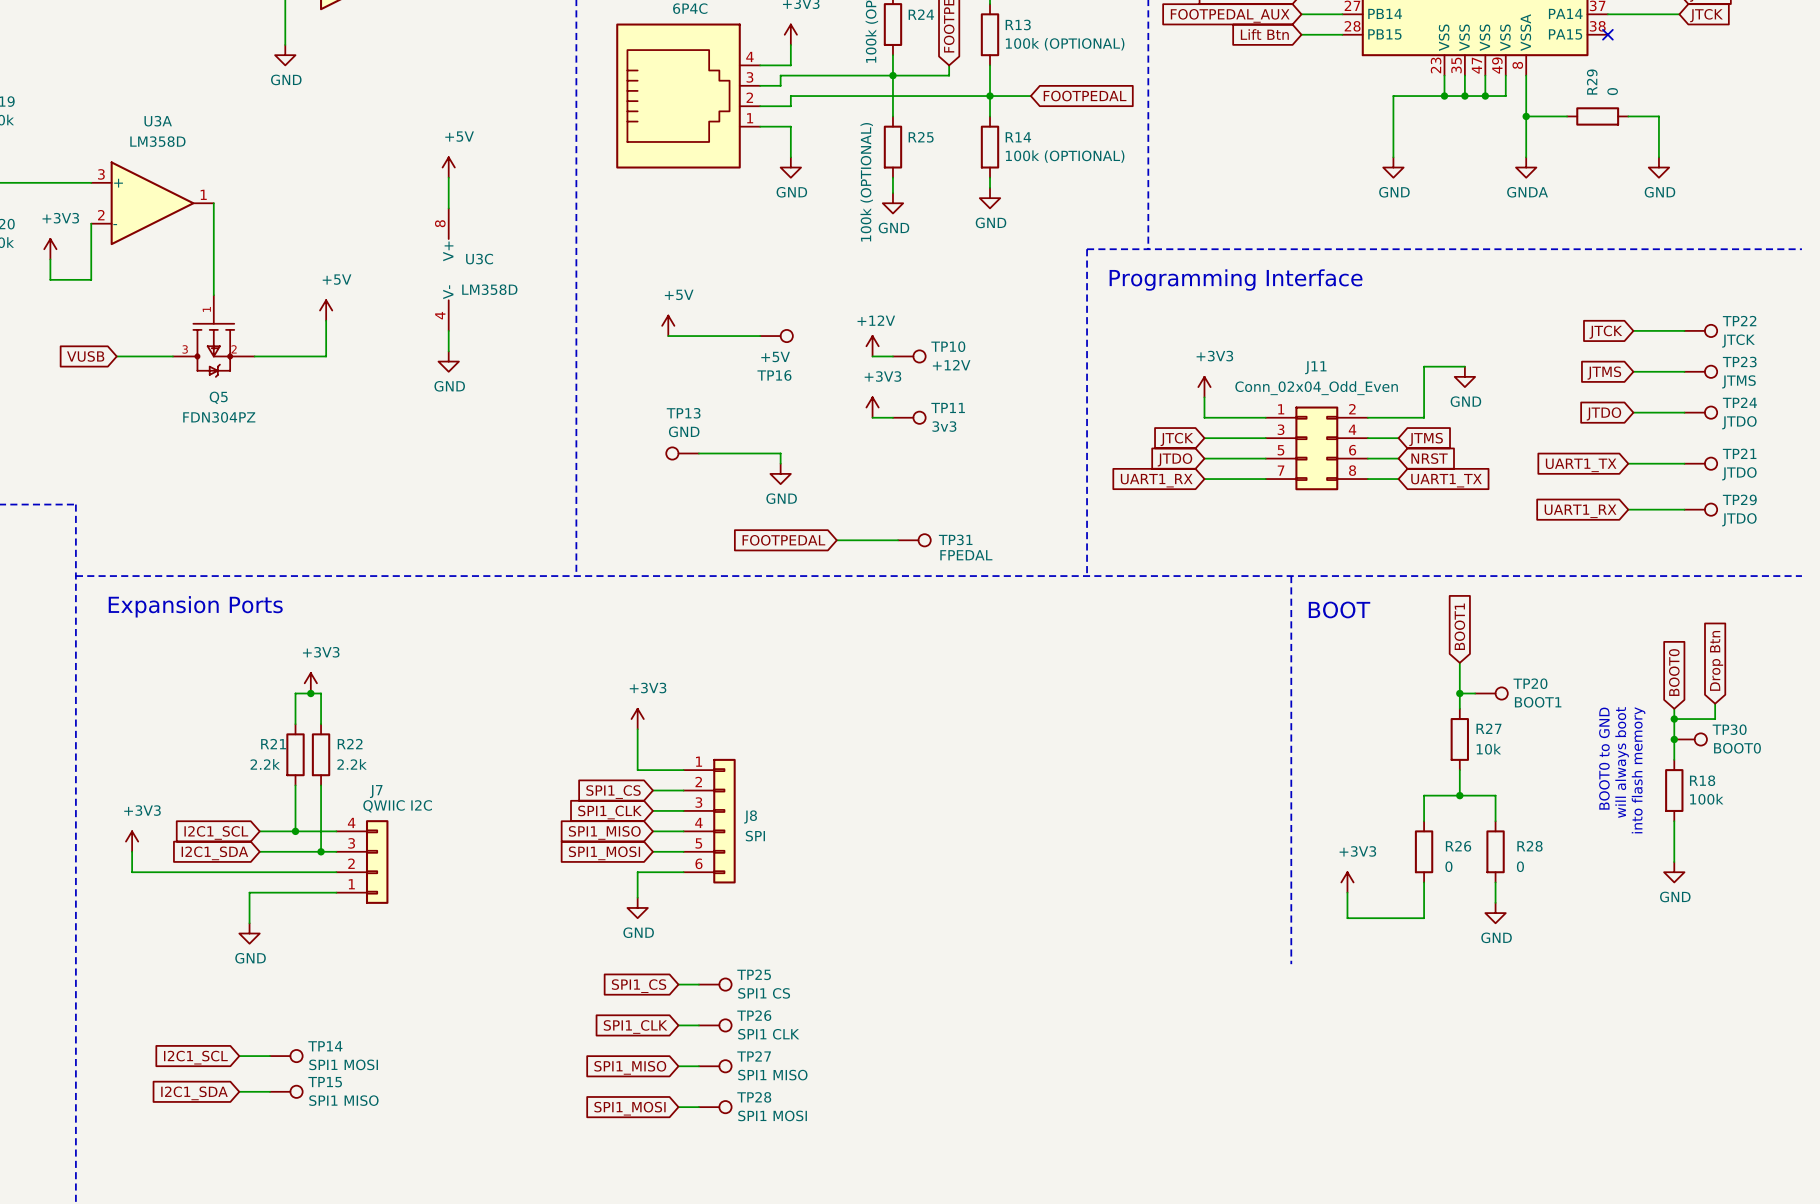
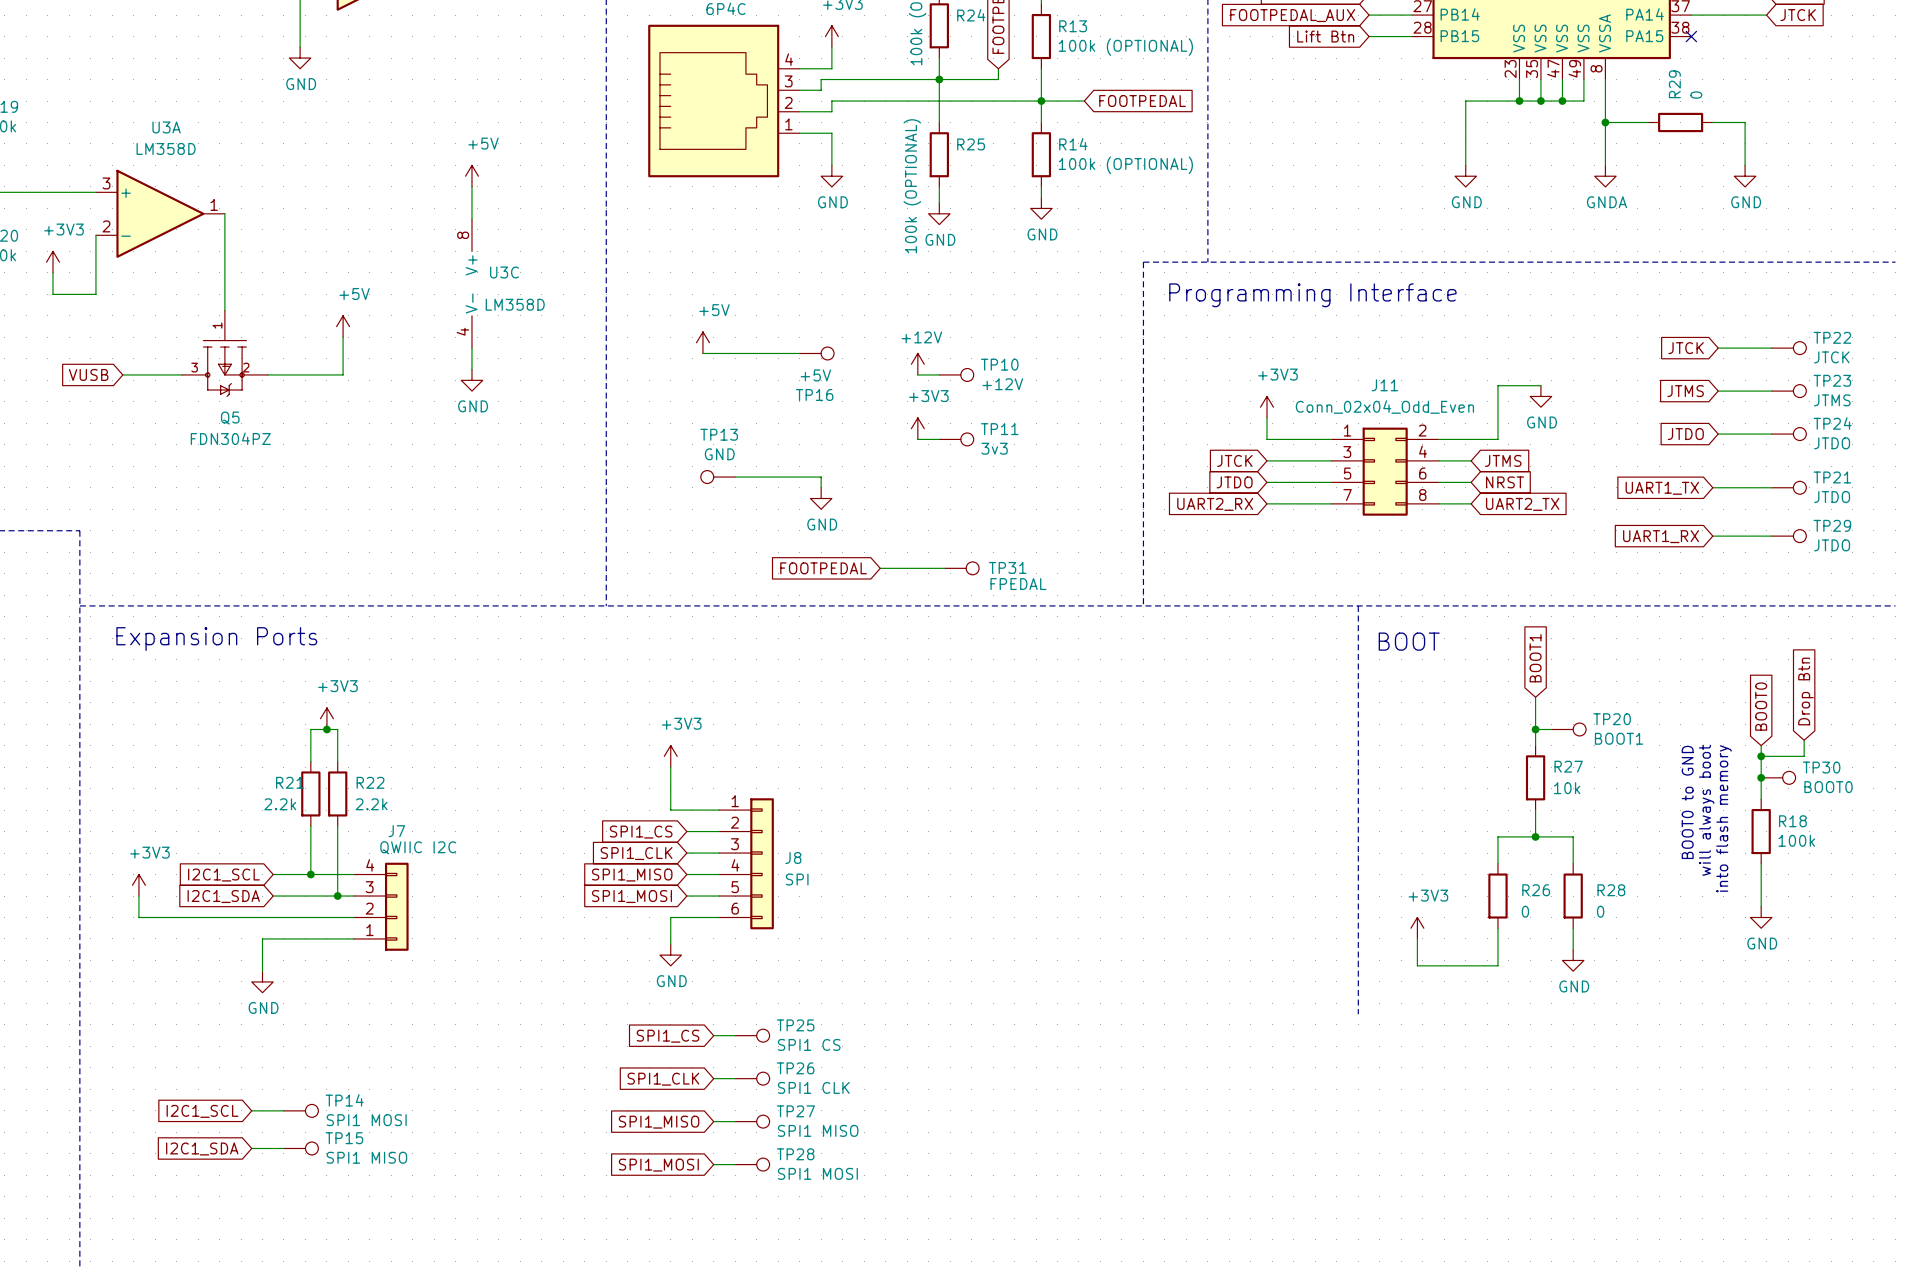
global label: UART1_RX (1156, 480) -> UART2_RX (1215, 504)
global label: UART1_TX (1446, 480) -> UART2_TX (1522, 504)

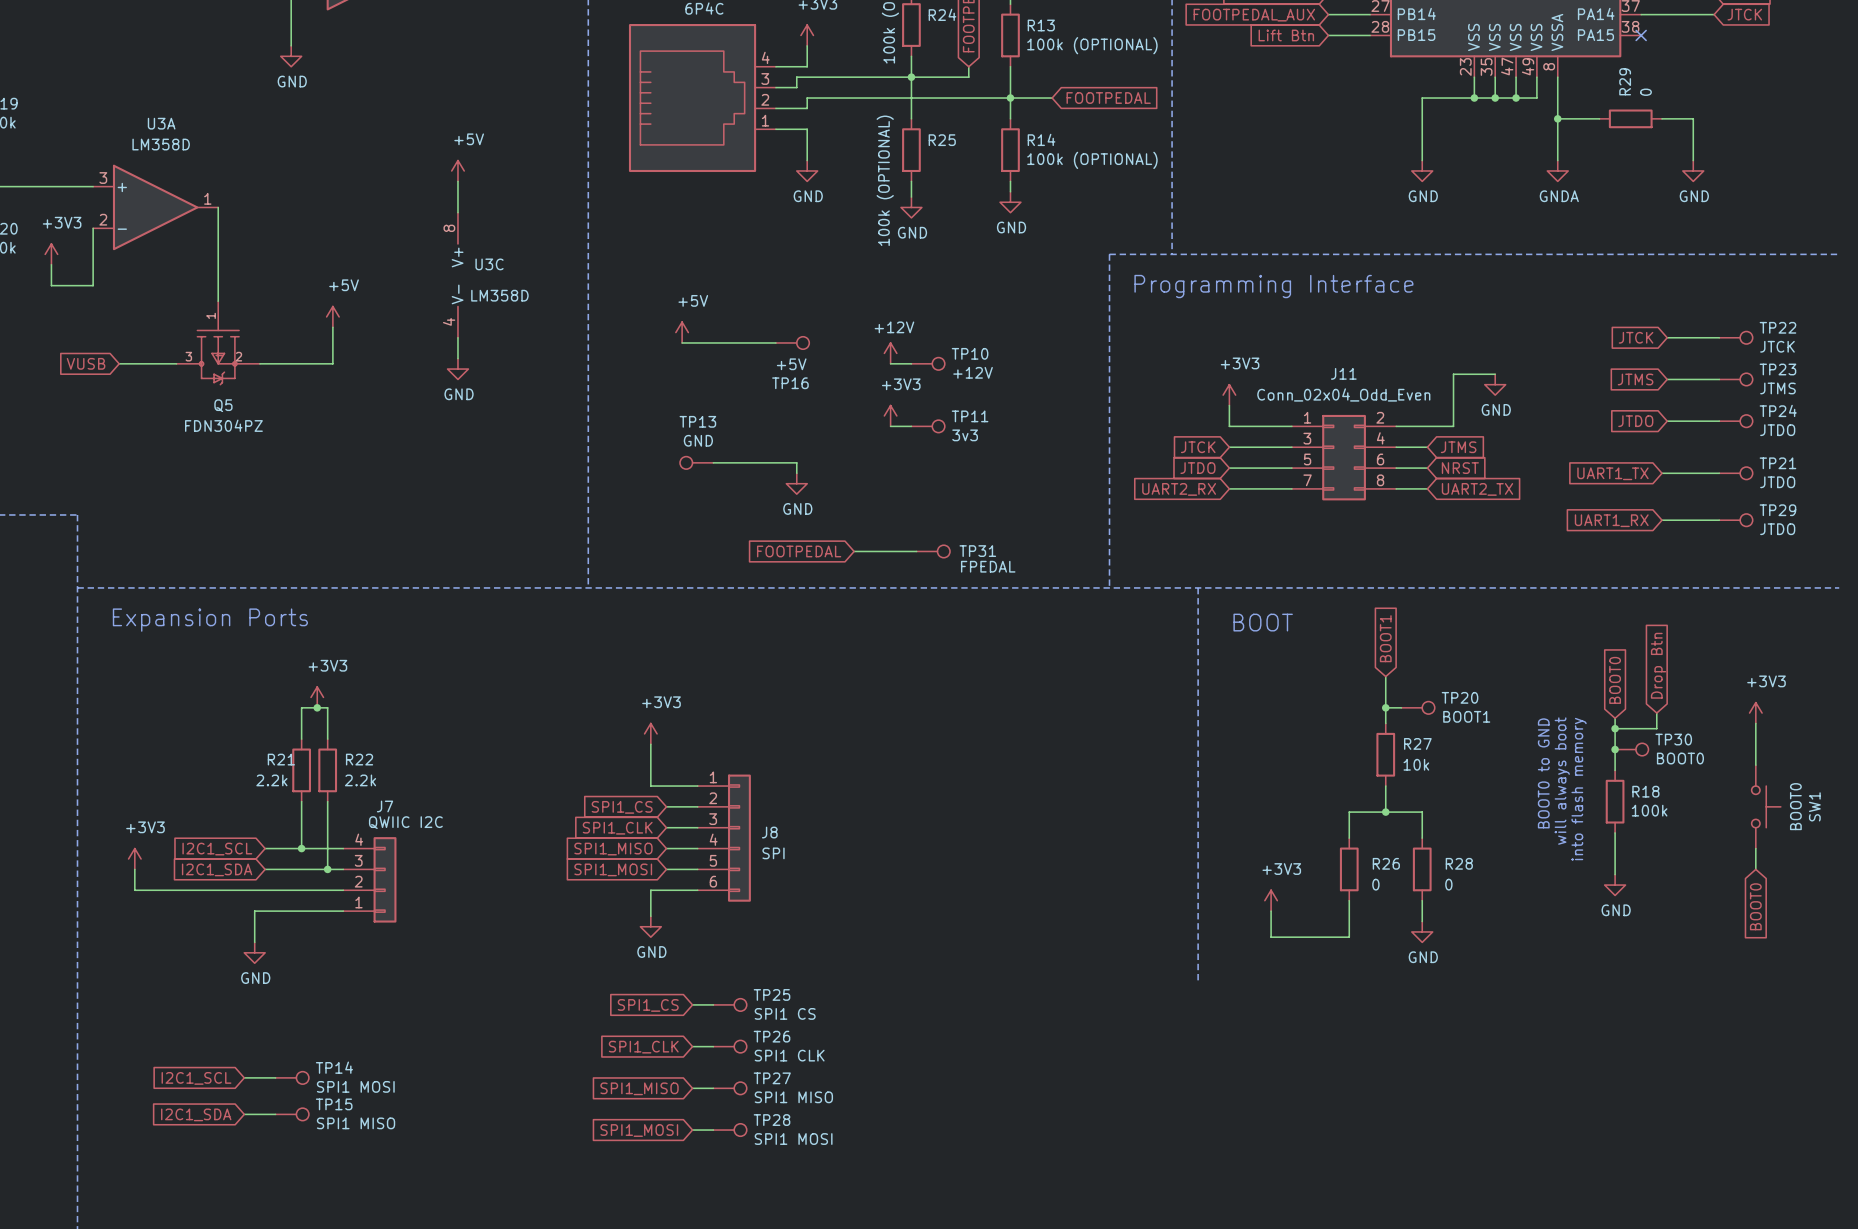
line: (1358, 605) (1358, 1014) -> (1198, 587) (1198, 984)
text position: BOOT (1409, 641) -> BOOT (1263, 622)
global label position: BOOT1 (1535, 658) -> BOOT1 (1385, 638)
global label position: Drop Btn (1805, 691) -> Drop Btn (1658, 665)
wire: (1535, 697) (1535, 745) -> (1385, 676) (1385, 723)
global label: none -> BOOT0 (1615, 680)
global label: BOOT0 (1761, 706) -> none
junction: none -> (1385, 707)
wire: (1535, 729) (1551, 729) -> (1385, 707) (1401, 707)
junction: (1535, 729) -> none
TP20 position: (1568, 729) -> (1418, 707)
power symbol: none -> +3V3 (1755, 713)
wire: (1804, 740) (1804, 756) (1761, 756) -> (1656, 713) (1656, 728) (1615, 728)
wire: (1761, 745) (1761, 799) -> (1615, 718) (1615, 770)
wire: none -> (1755, 723) (1755, 765)
junction: none -> (1615, 728)
junction: (1761, 756) -> none
junction: none -> (1615, 749)
R27 position: (1535, 777) -> (1385, 754)
junction: (1761, 777) -> none
TP30 position: (1778, 777) -> (1631, 749)
text position: BOOT0 to GND (1687, 802) -> BOOT0 to GND (1543, 773)
wire: (1535, 810) (1535, 836) -> (1385, 786) (1385, 812)
text position: will always boot (1706, 810) -> will always boot (1562, 781)
text position: into flash memory (1724, 818) -> into flash memory (1579, 789)
R18 position: (1761, 831) -> (1615, 801)
SW1: none -> BOOT0 (1766, 806)
junction: none -> (1385, 812)
junction: (1535, 836) -> none
wire: (1497, 863) (1497, 836) (1573, 836) (1573, 863) -> (1349, 838) (1349, 812) (1422, 812) (1422, 838)
wire: (1761, 863) (1761, 906) -> (1615, 832) (1615, 874)
wire: none -> (1755, 848) (1755, 869)
R26 position: (1497, 896) -> (1349, 869)
R28 position: (1573, 896) -> (1422, 869)
power symbol: none -> GND (1615, 885)
power symbol: GND (1761, 917) -> none
power symbol position: +3V3 (1417, 928) -> +3V3 (1271, 900)
wire: (1497, 928) (1497, 965) (1417, 965) (1417, 938) -> (1349, 900) (1349, 937) (1271, 937) (1271, 911)
wire: (1573, 928) (1573, 949) -> (1422, 900) (1422, 921)
global label: none -> BOOT0 (1755, 906)
power symbol: none -> GND (1422, 931)
power symbol: GND (1573, 960) -> none

